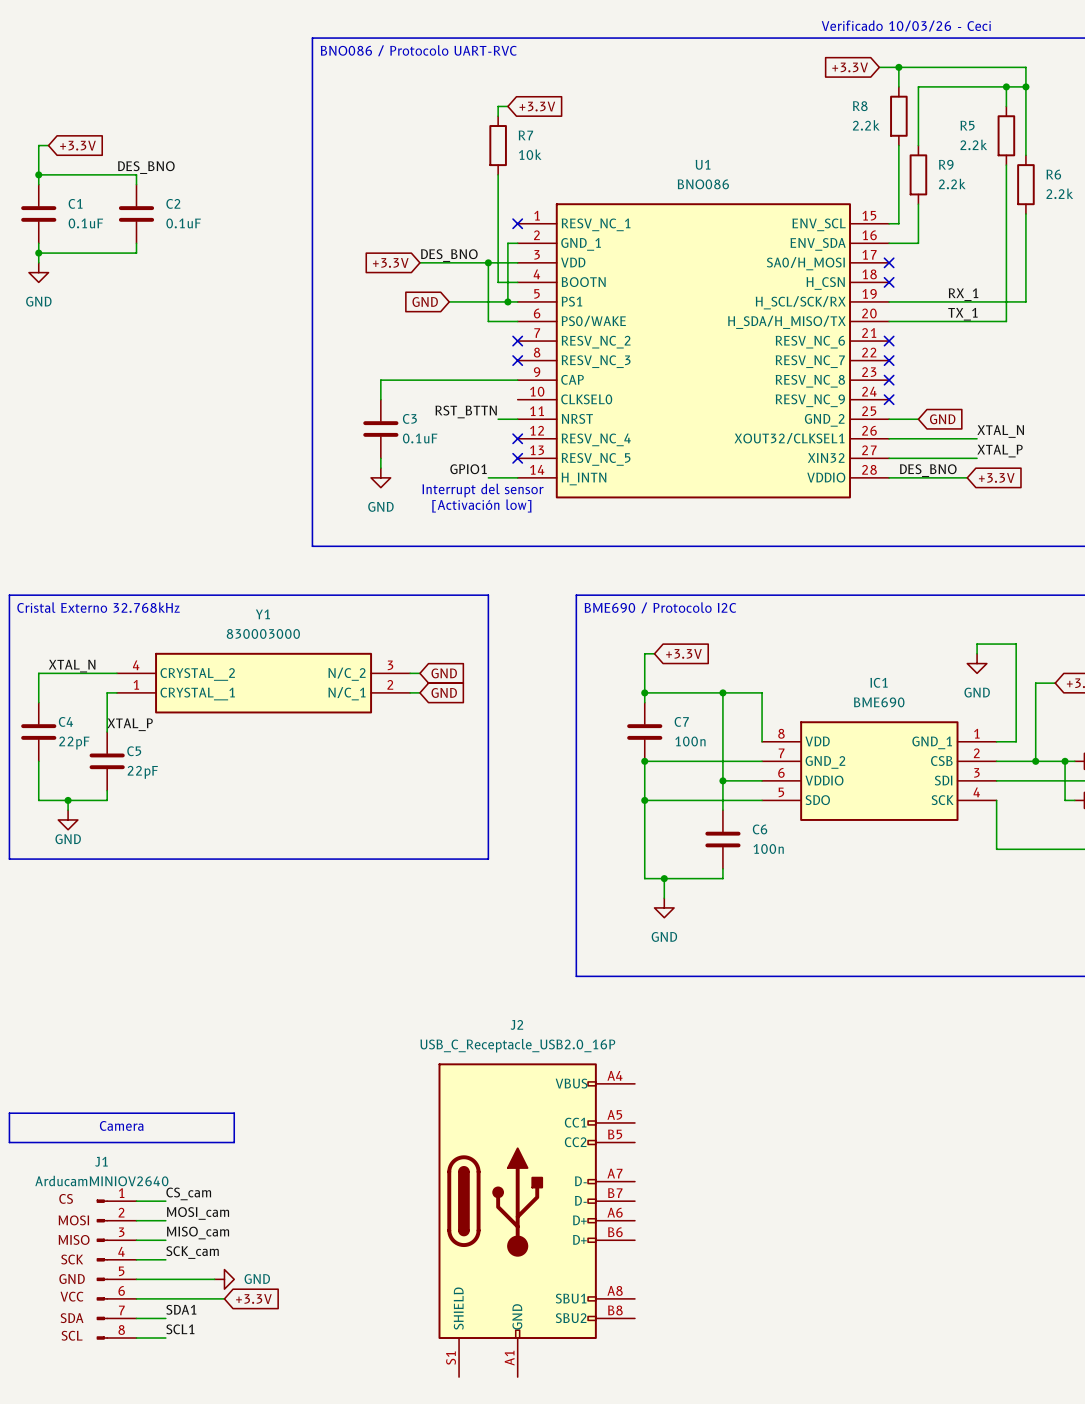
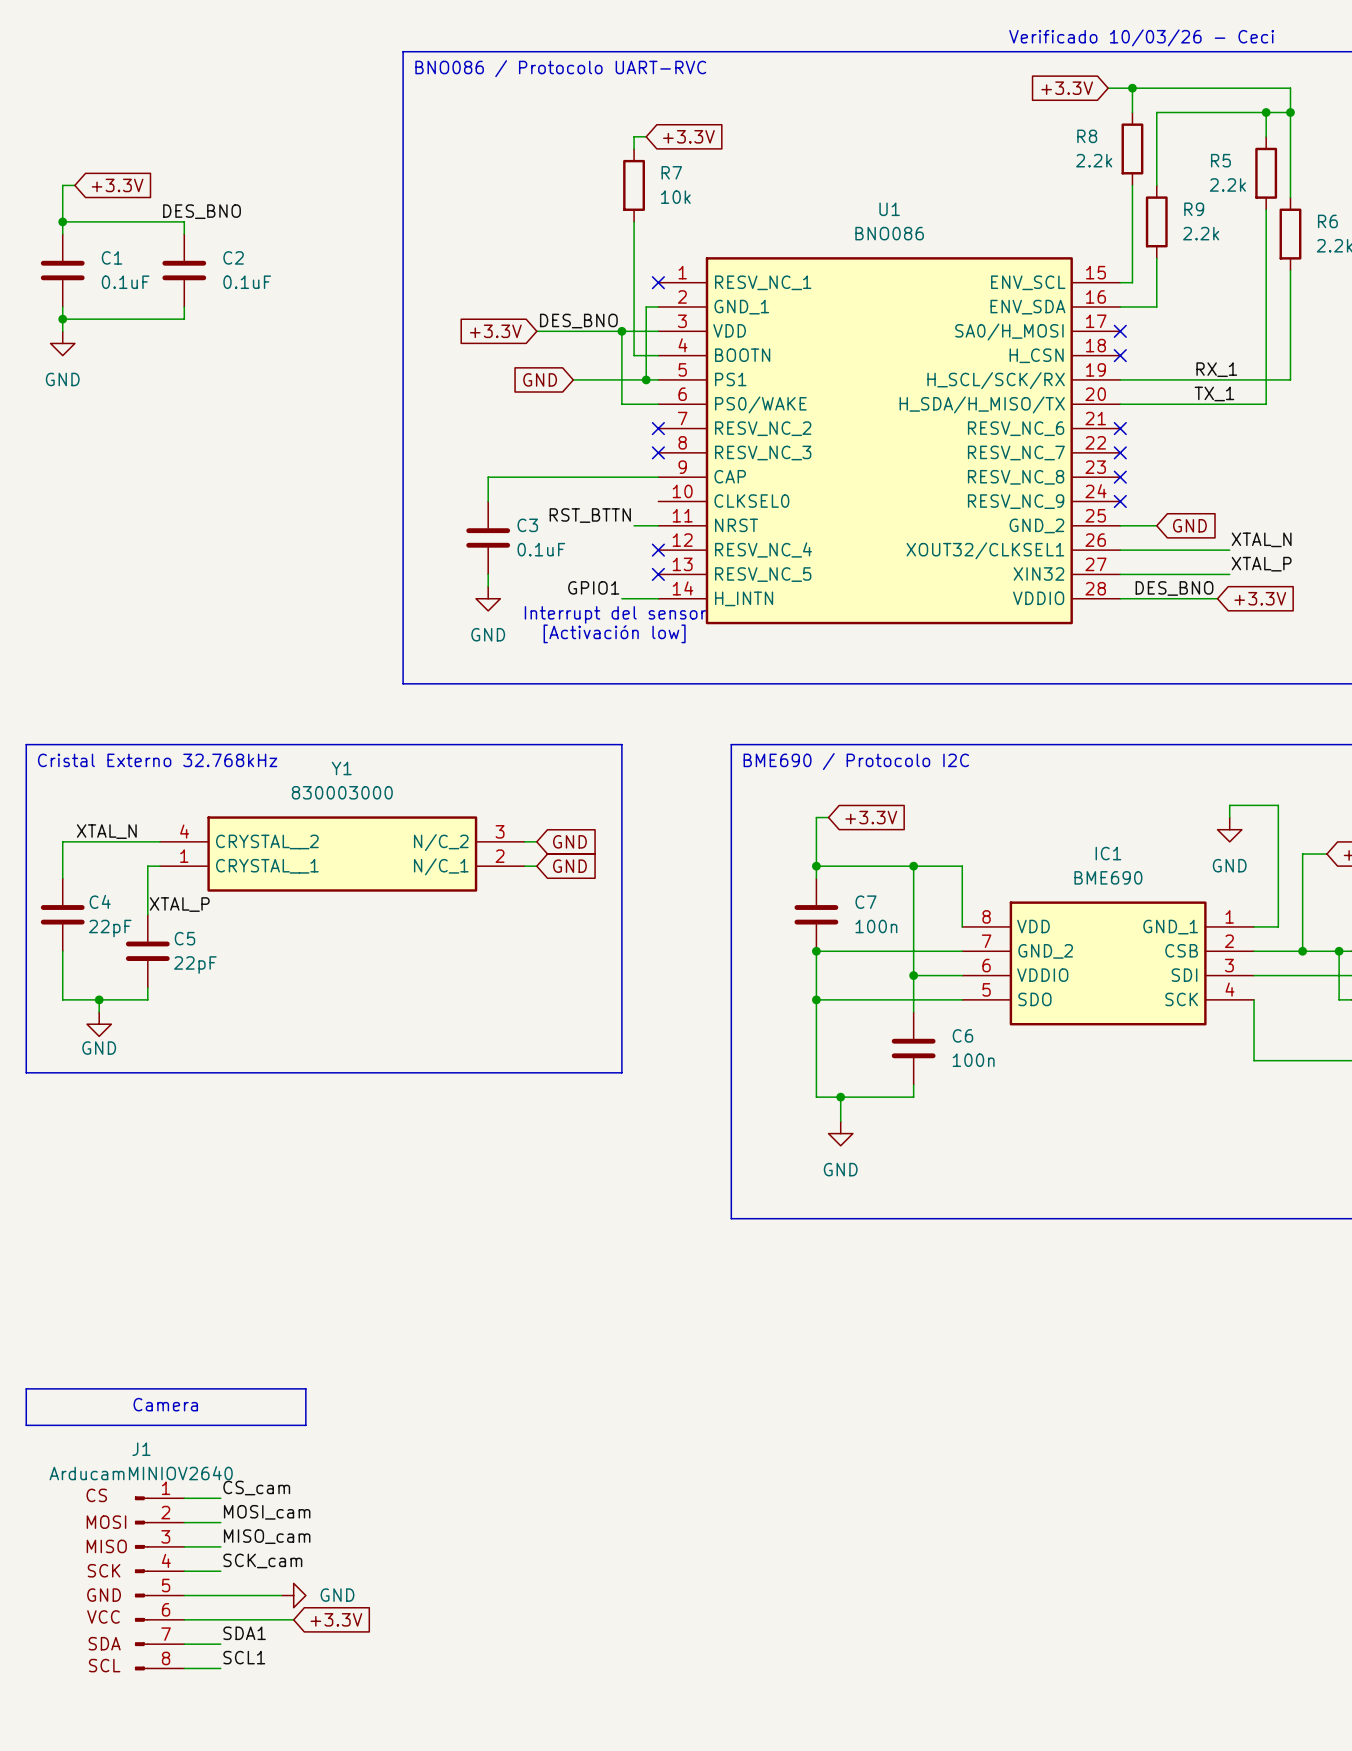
J2: USB_C_Receptacle_USB2.0_16P (536, 1220) -> none

